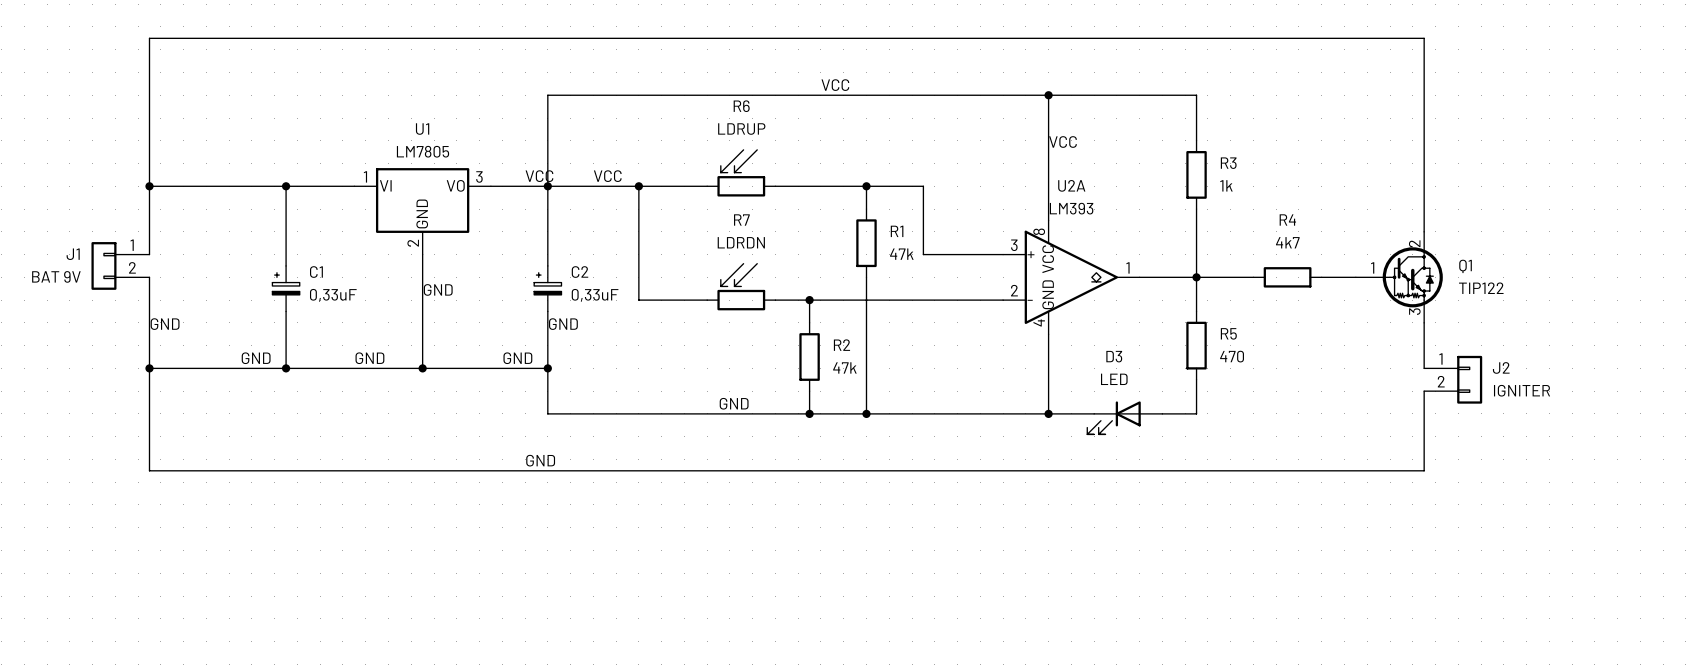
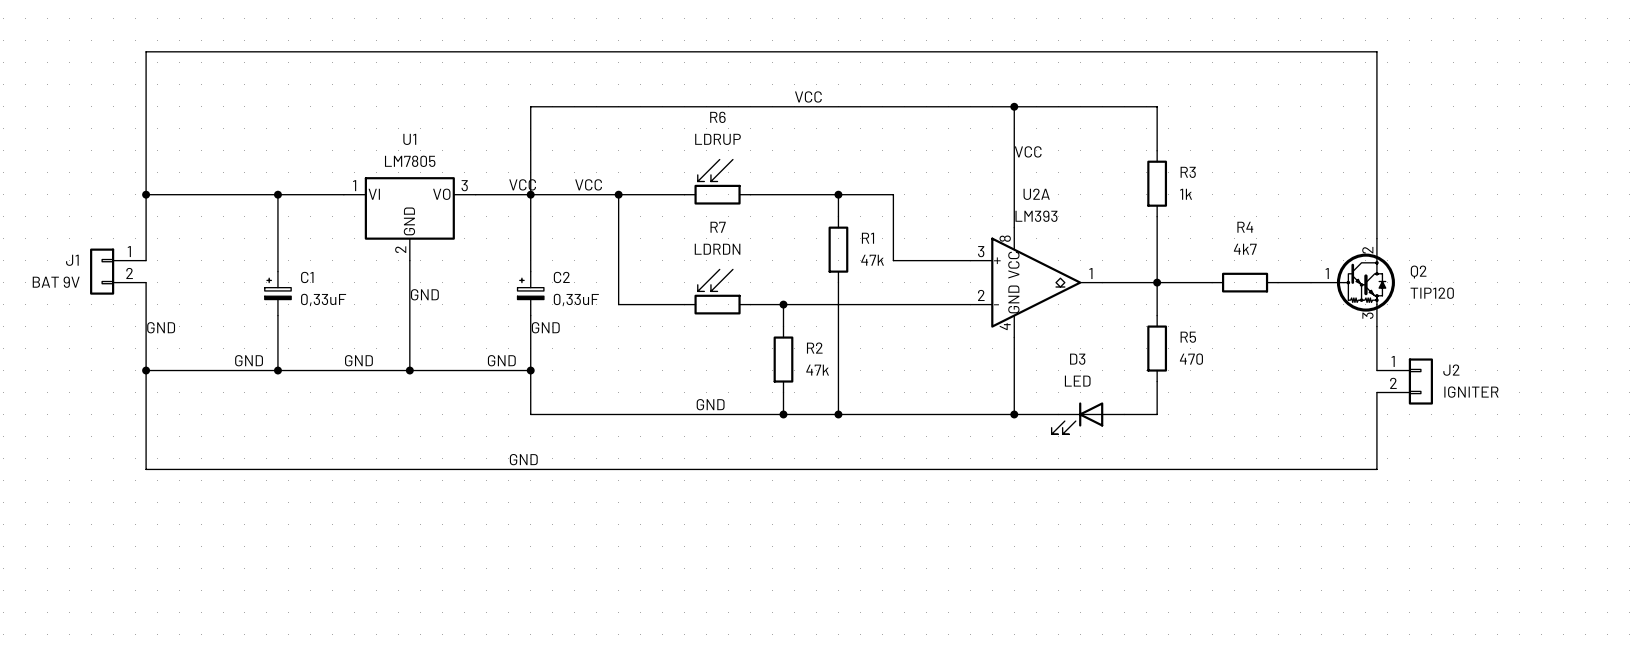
Q1 name: Q1 (1465, 266) -> Q2 (1418, 272)
Q1 value: TIP122 (1481, 288) -> TIP120 (1432, 293)

